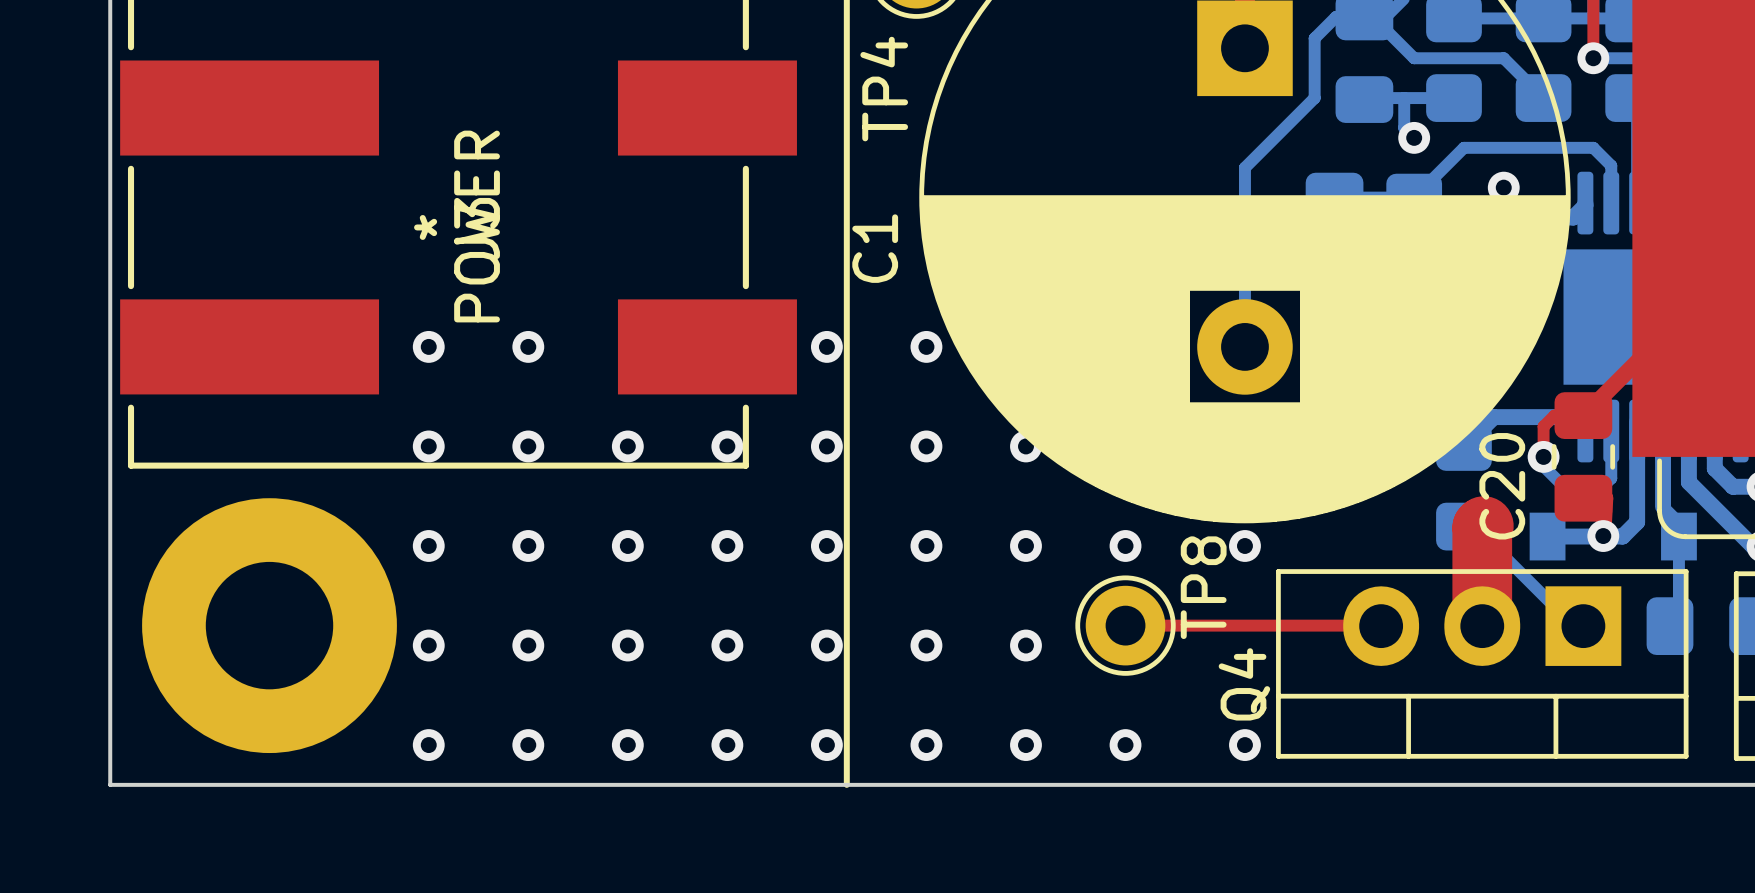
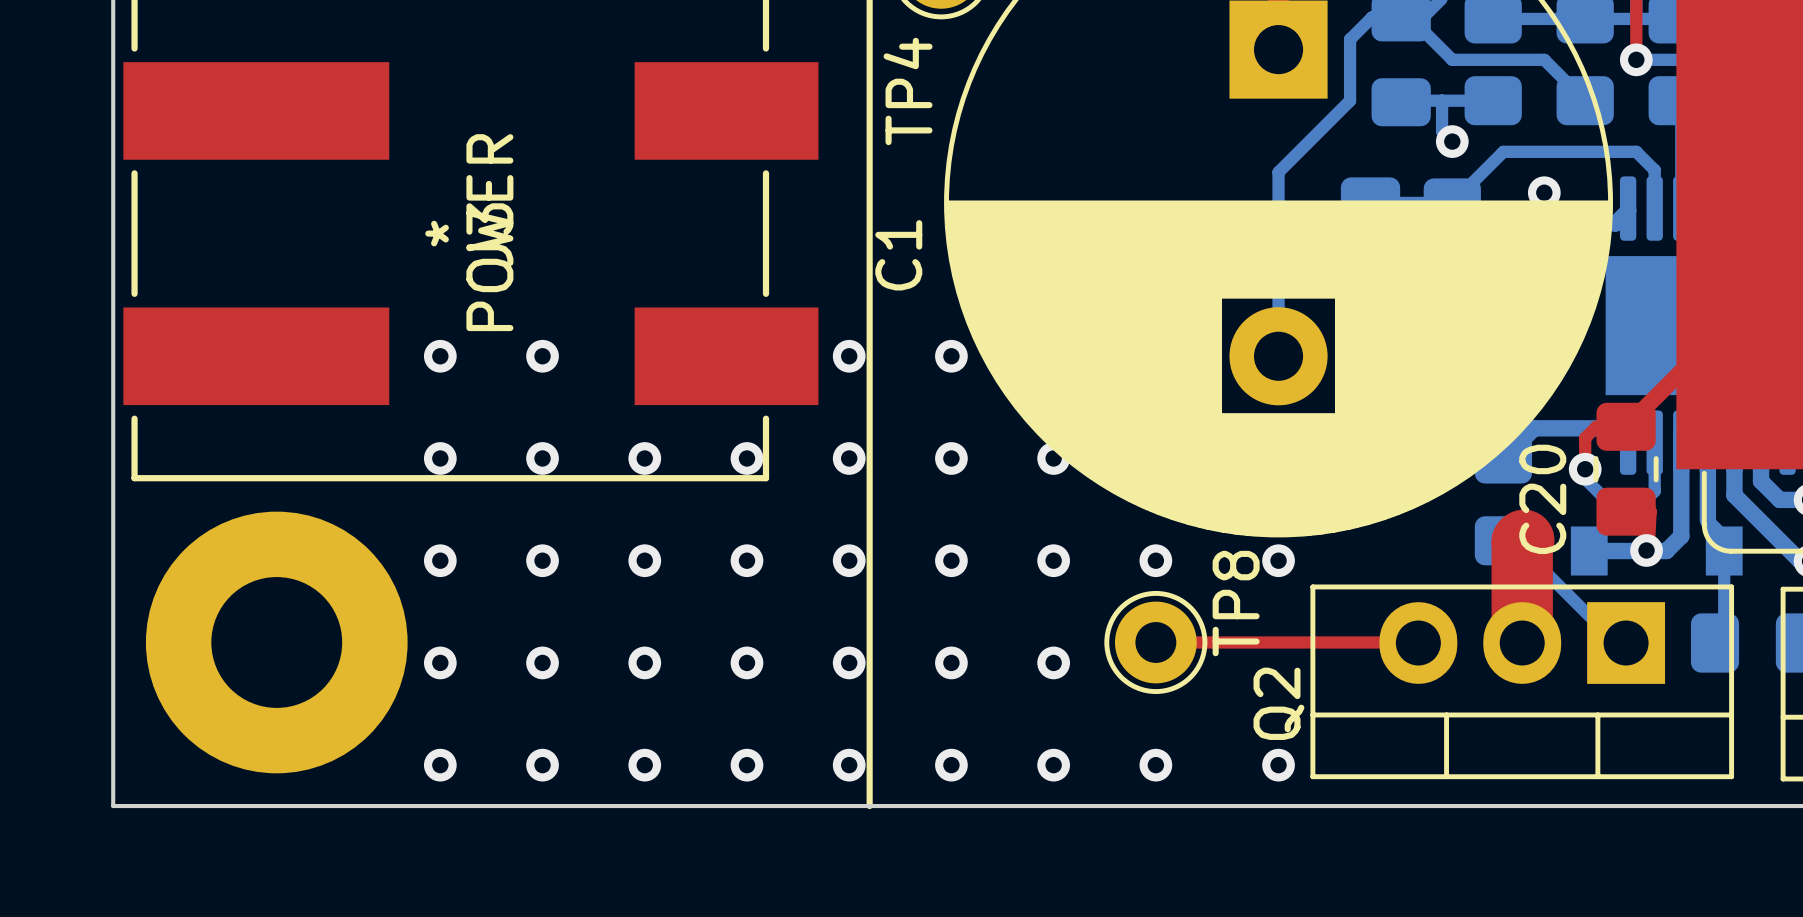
Q4 name: Q4 (1244, 684) -> Q2 (1278, 703)

